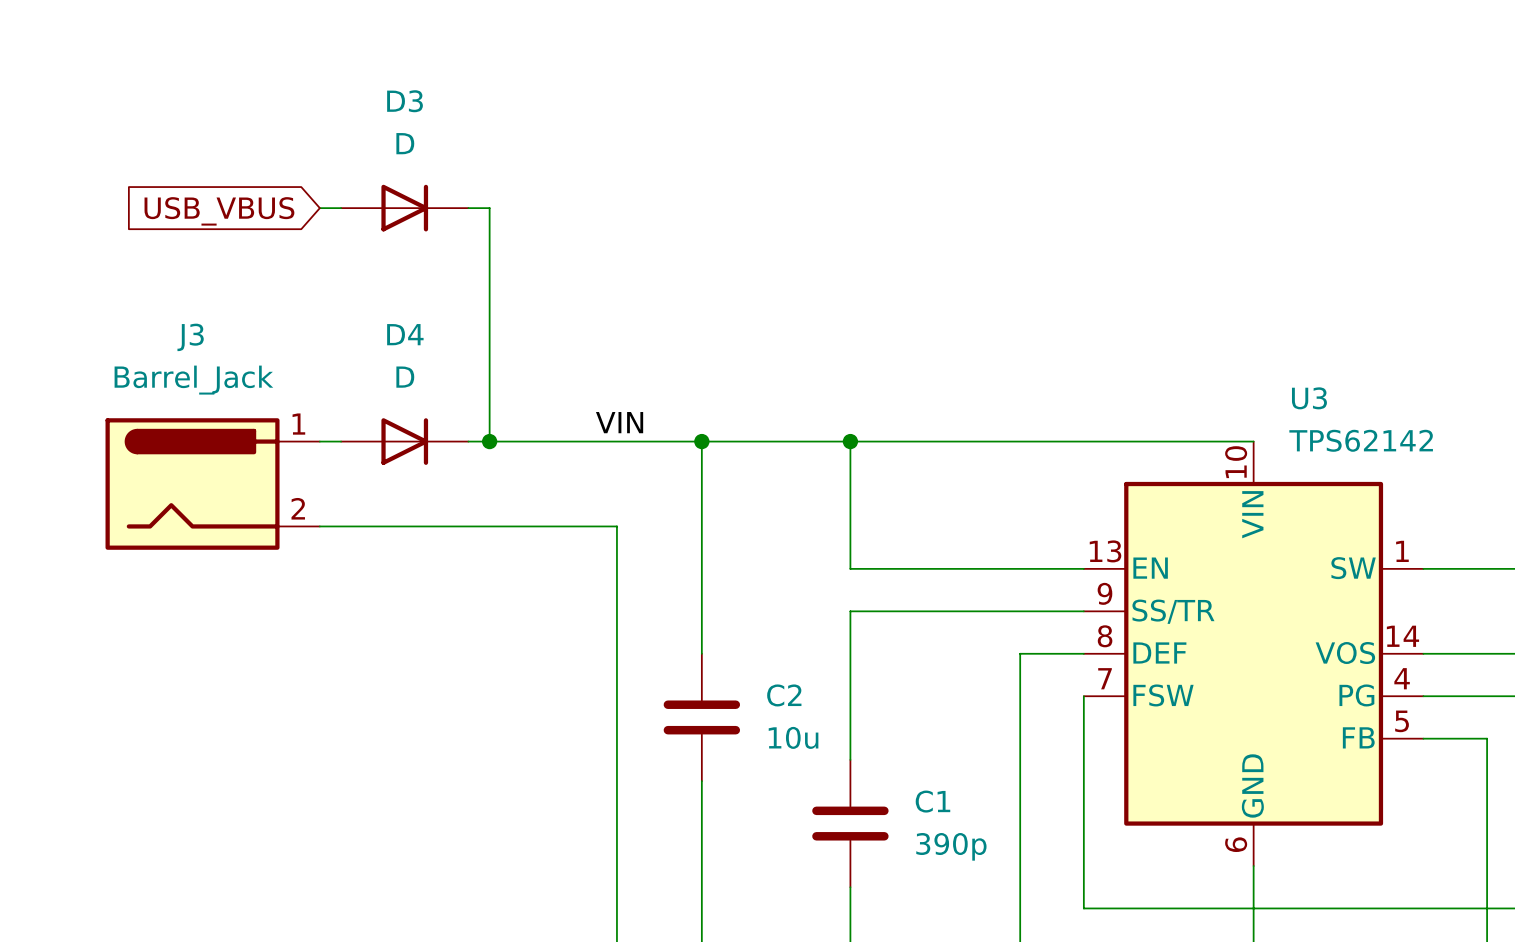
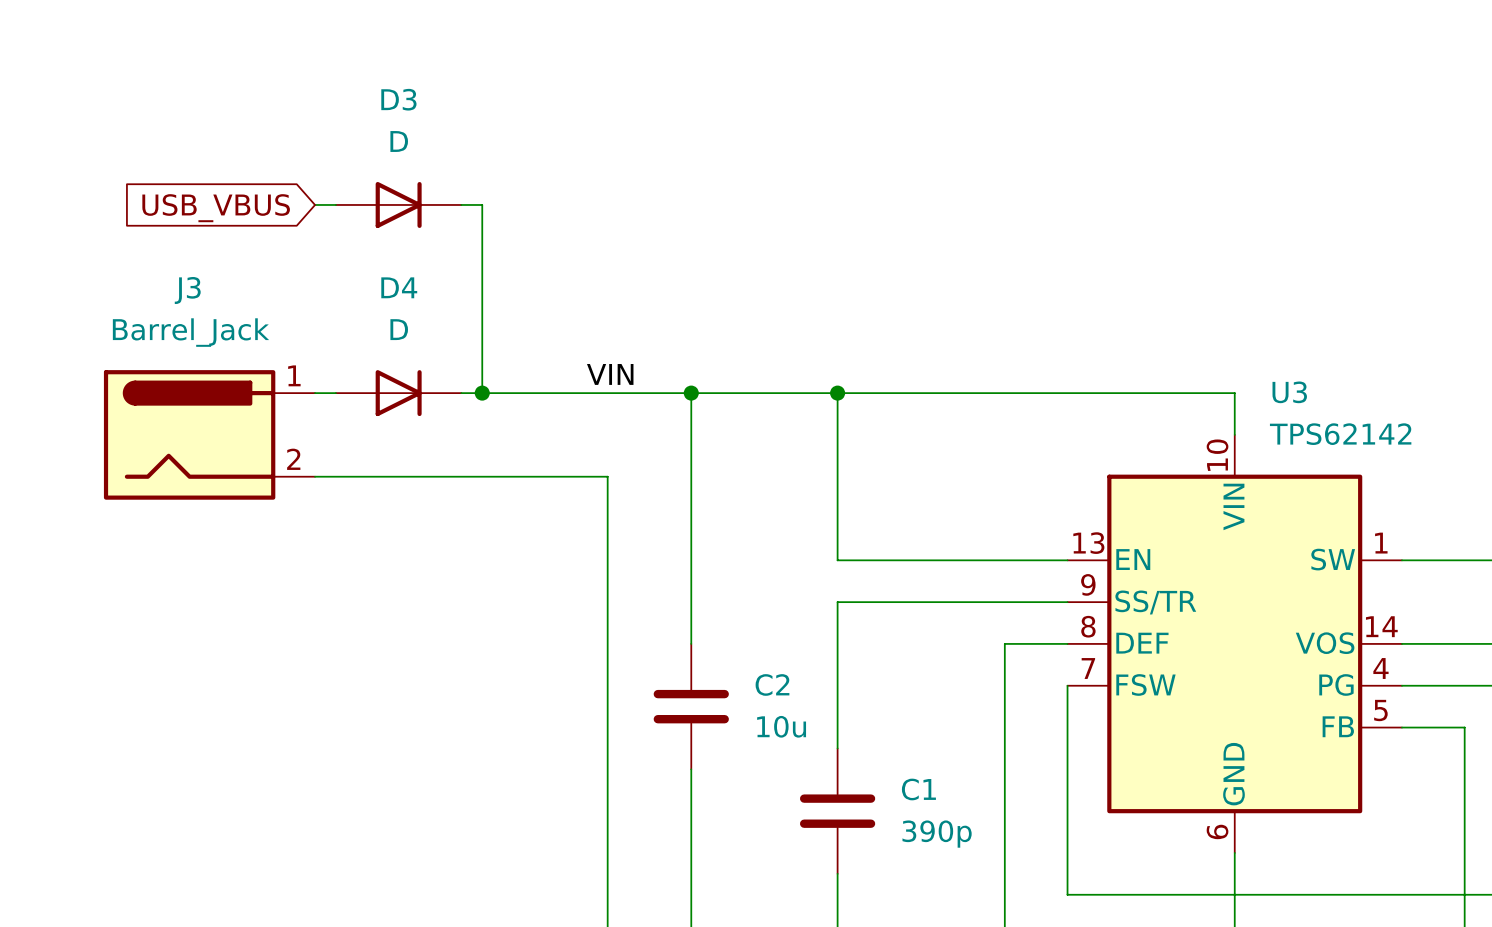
wire: (489, 399) (489, 441) -> (691, 393) (691, 434)
wire: none -> (837, 393) (837, 434)
label position: VIN (619, 422) -> VIN (610, 374)
wire: (319, 441) (341, 441) -> (315, 393) (335, 393)
D4 position: (404, 441) -> (398, 393)
wire: (468, 441) (1253, 441) -> (461, 393) (1234, 393) (1234, 434)
junction position: (489, 441) -> (482, 393)
junction position: (701, 441) -> (691, 393)
junction position: (850, 441) -> (837, 393)
J3 position: (212, 484) -> (209, 434)
wire: (319, 526) (616, 526) -> (315, 476) (607, 476) (607, 518)

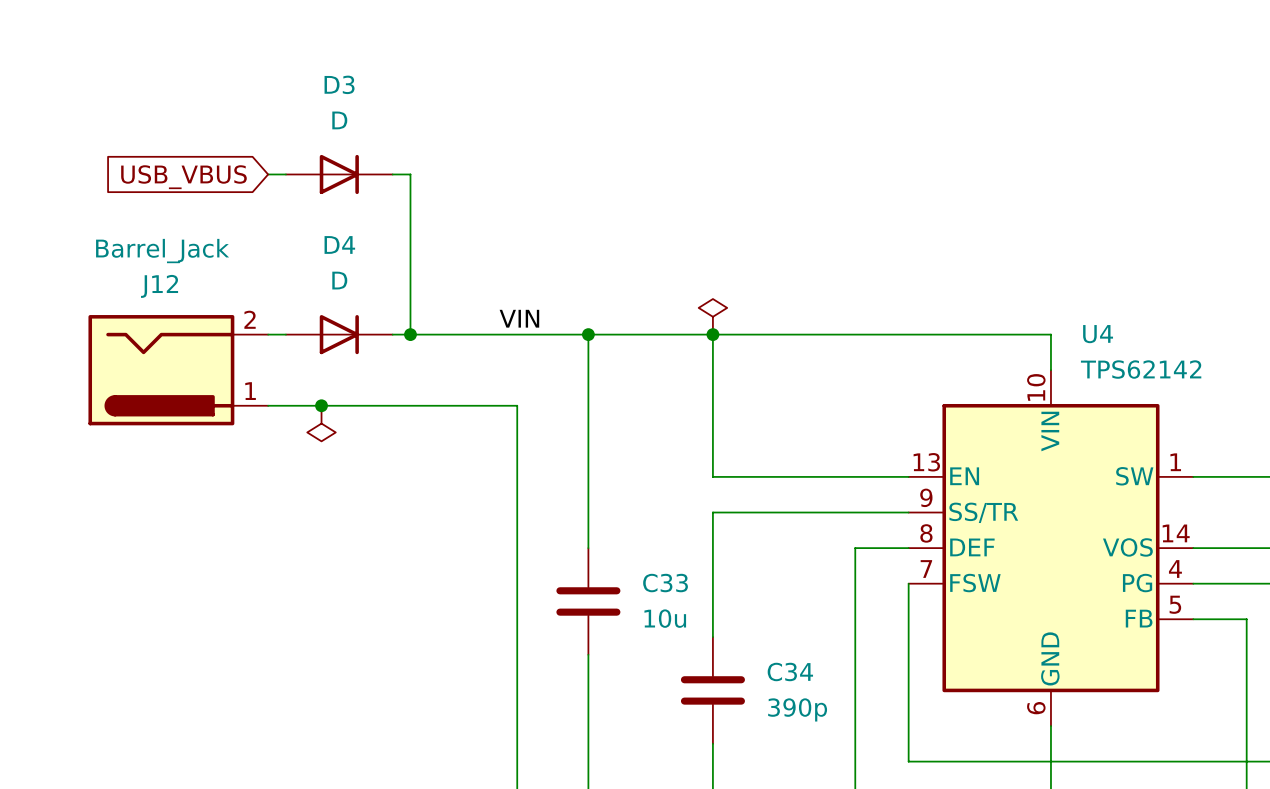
power symbol: none -> (712, 316)
U3 name: U3 (1289, 392) -> U4 (1098, 334)
J3: Barrel_Jack (209, 434) -> none
J12: none -> Barrel_Jack (178, 370)
junction: none -> (321, 405)
power symbol: none -> (321, 423)
C2 name: C2 (772, 684) -> C33 (665, 583)
C1 name: C1 (918, 789) -> C34 (790, 671)

